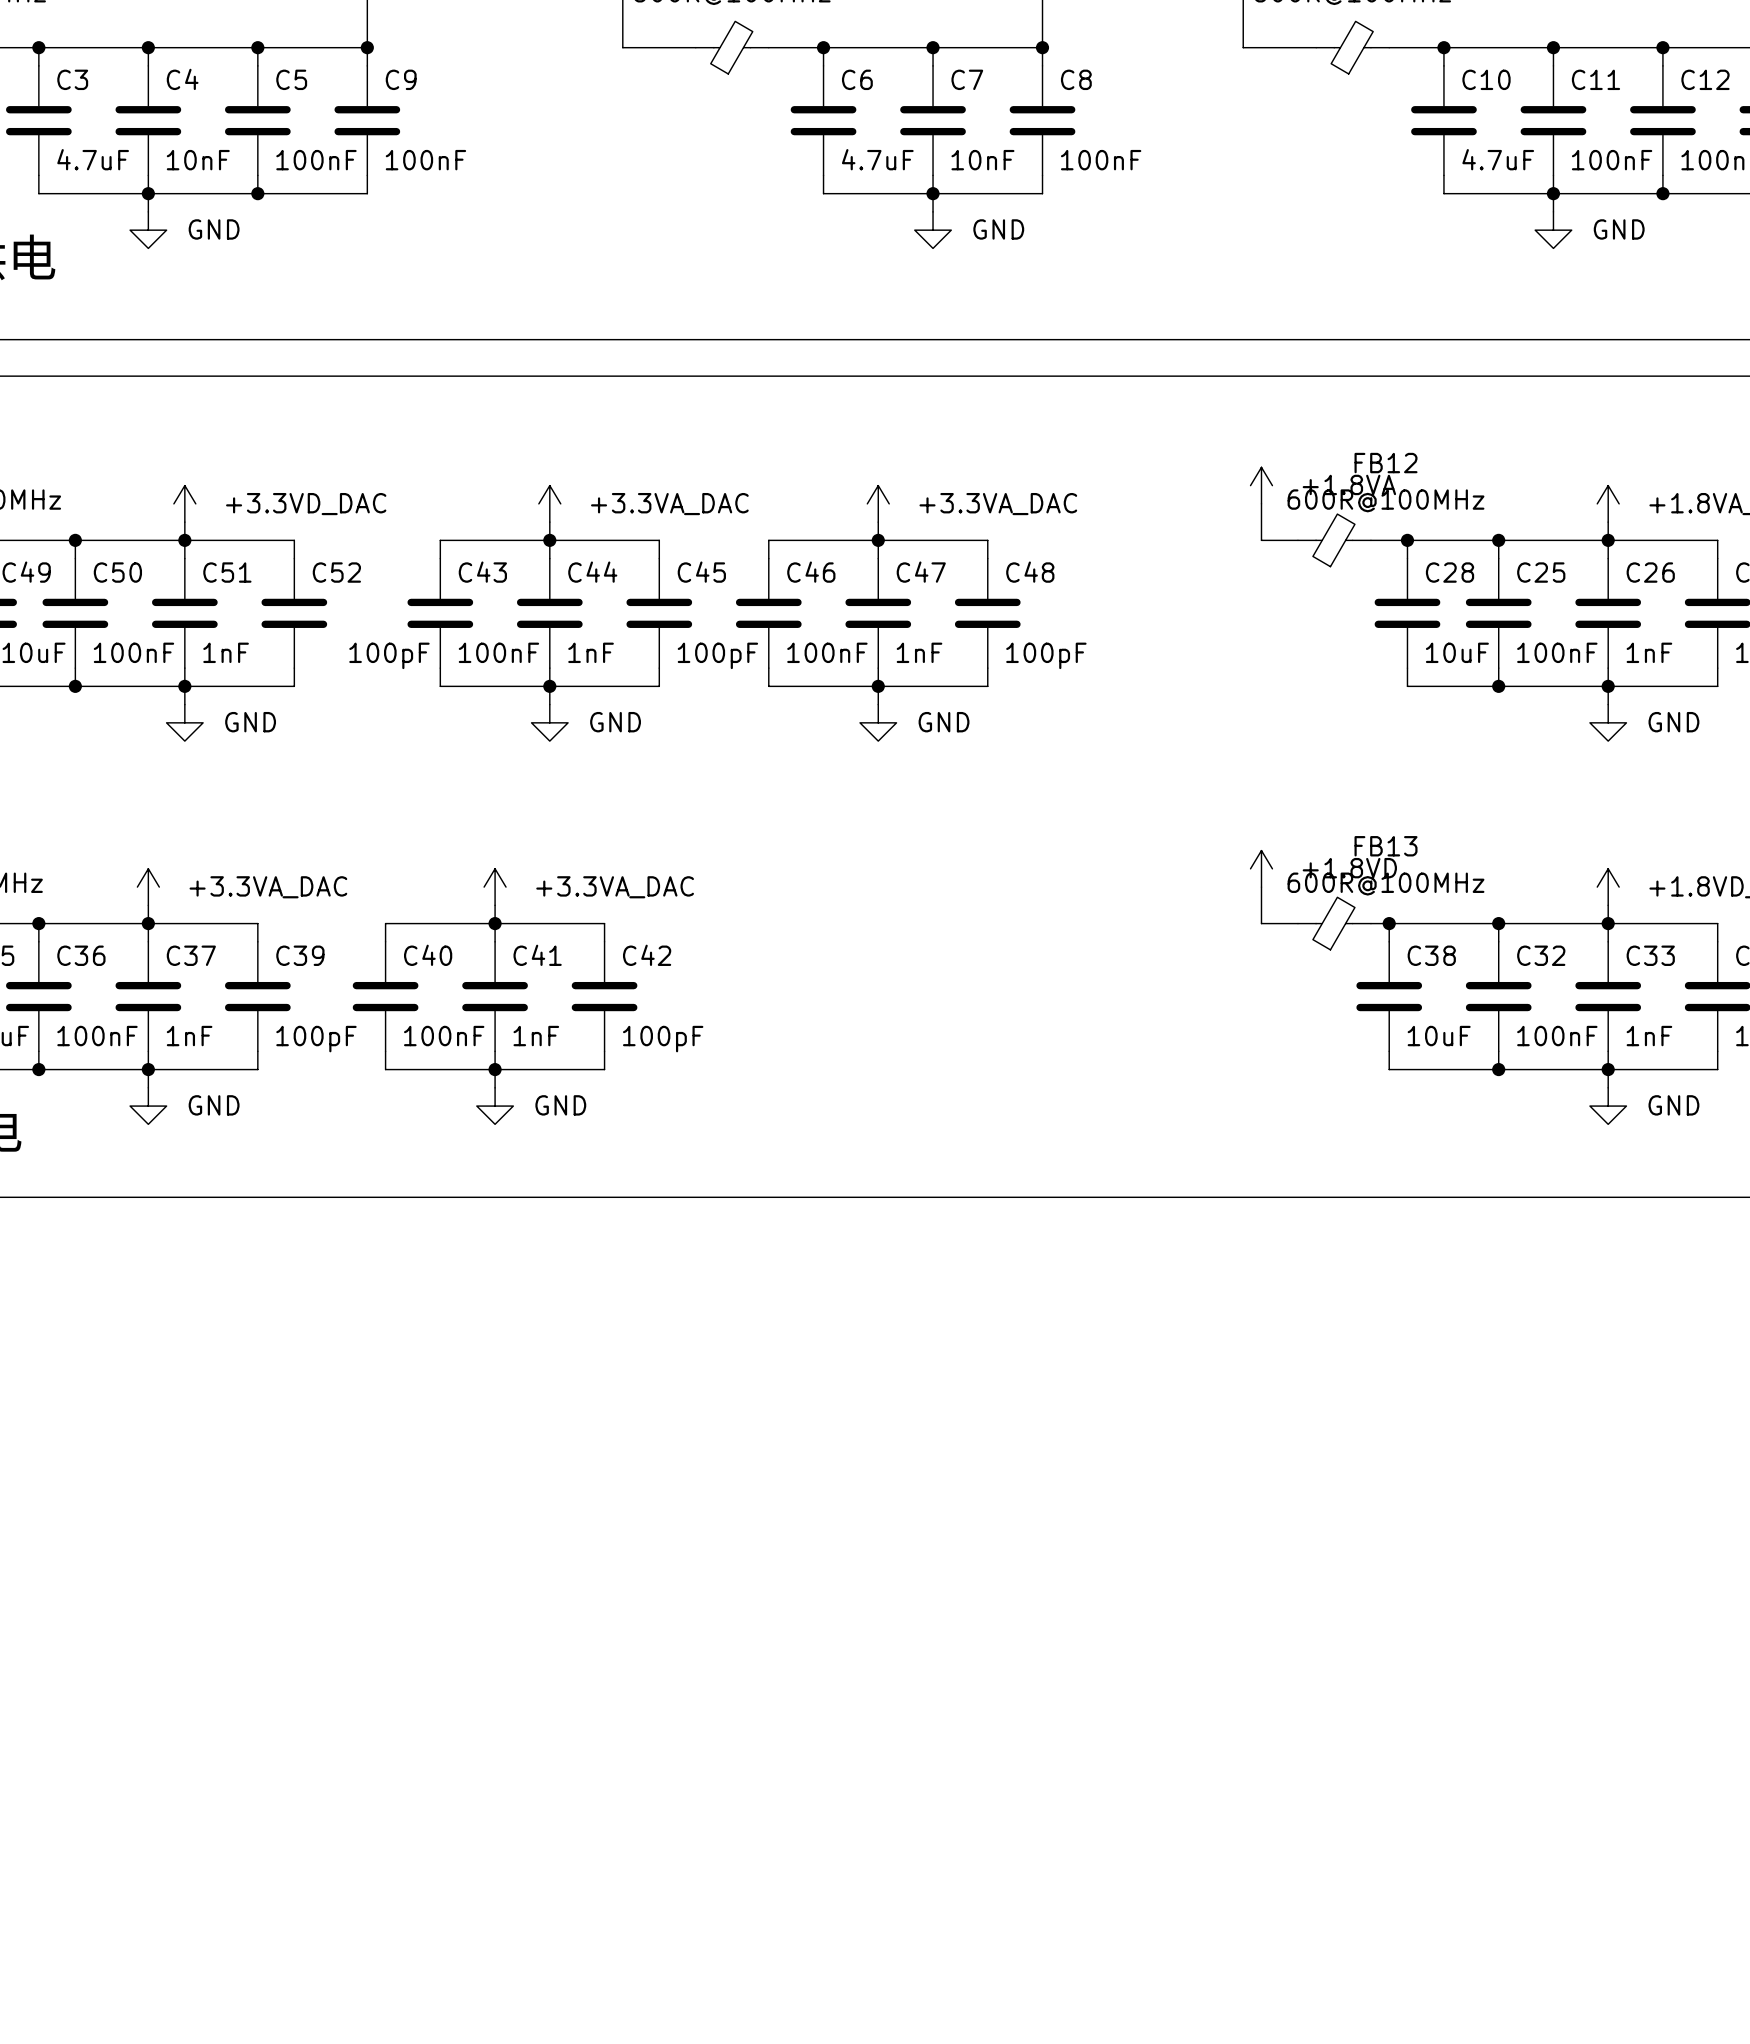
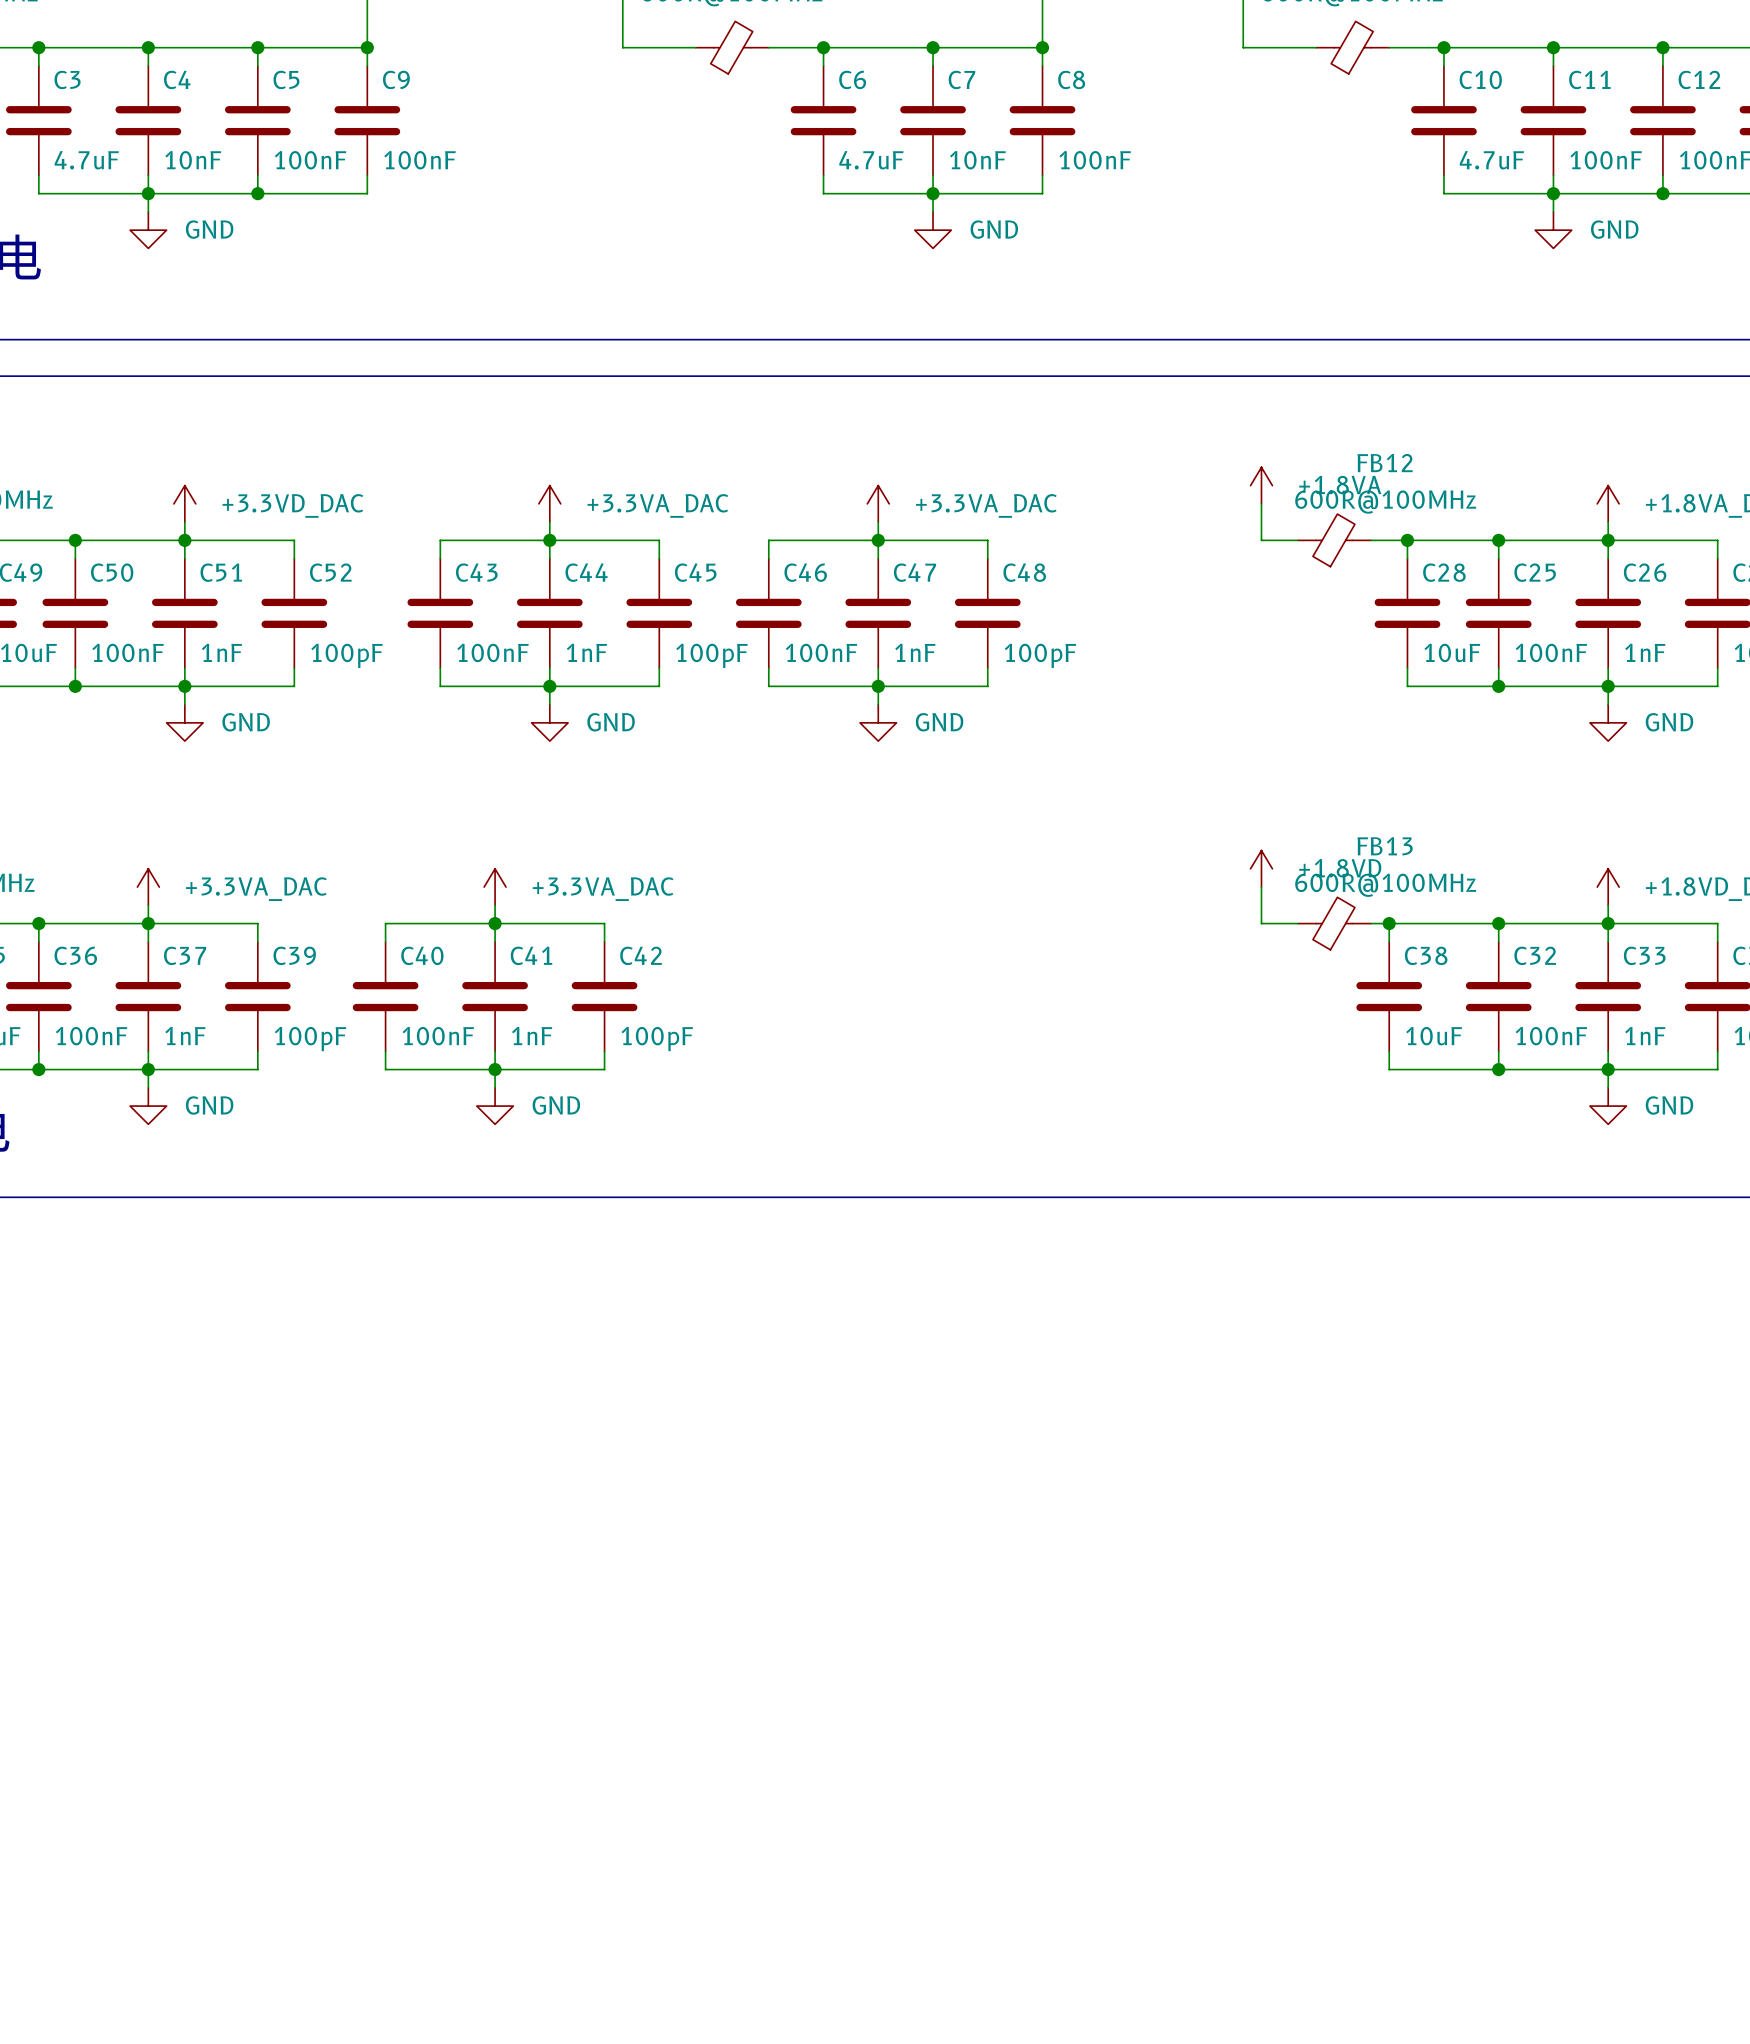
C52 value position: 100pF (389, 655) -> 100pF (347, 655)

